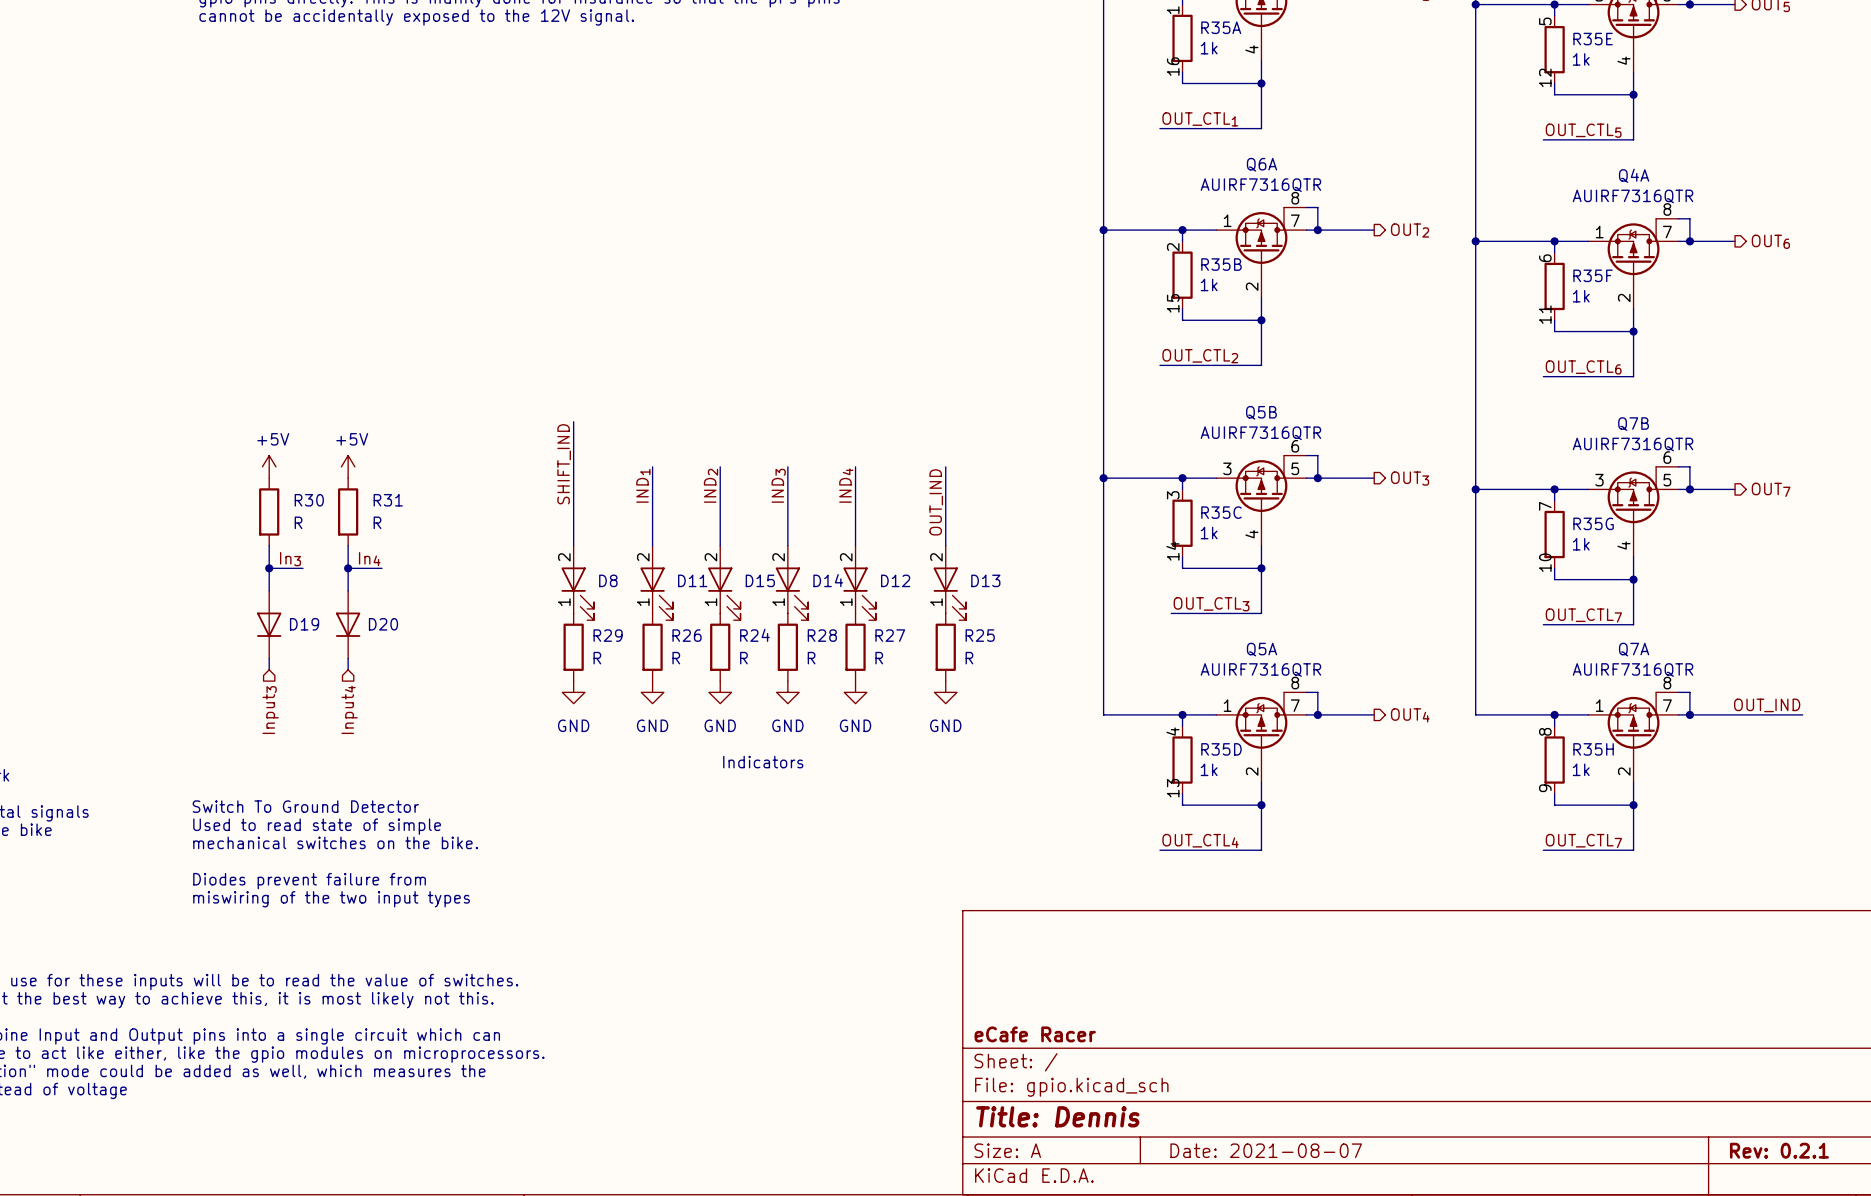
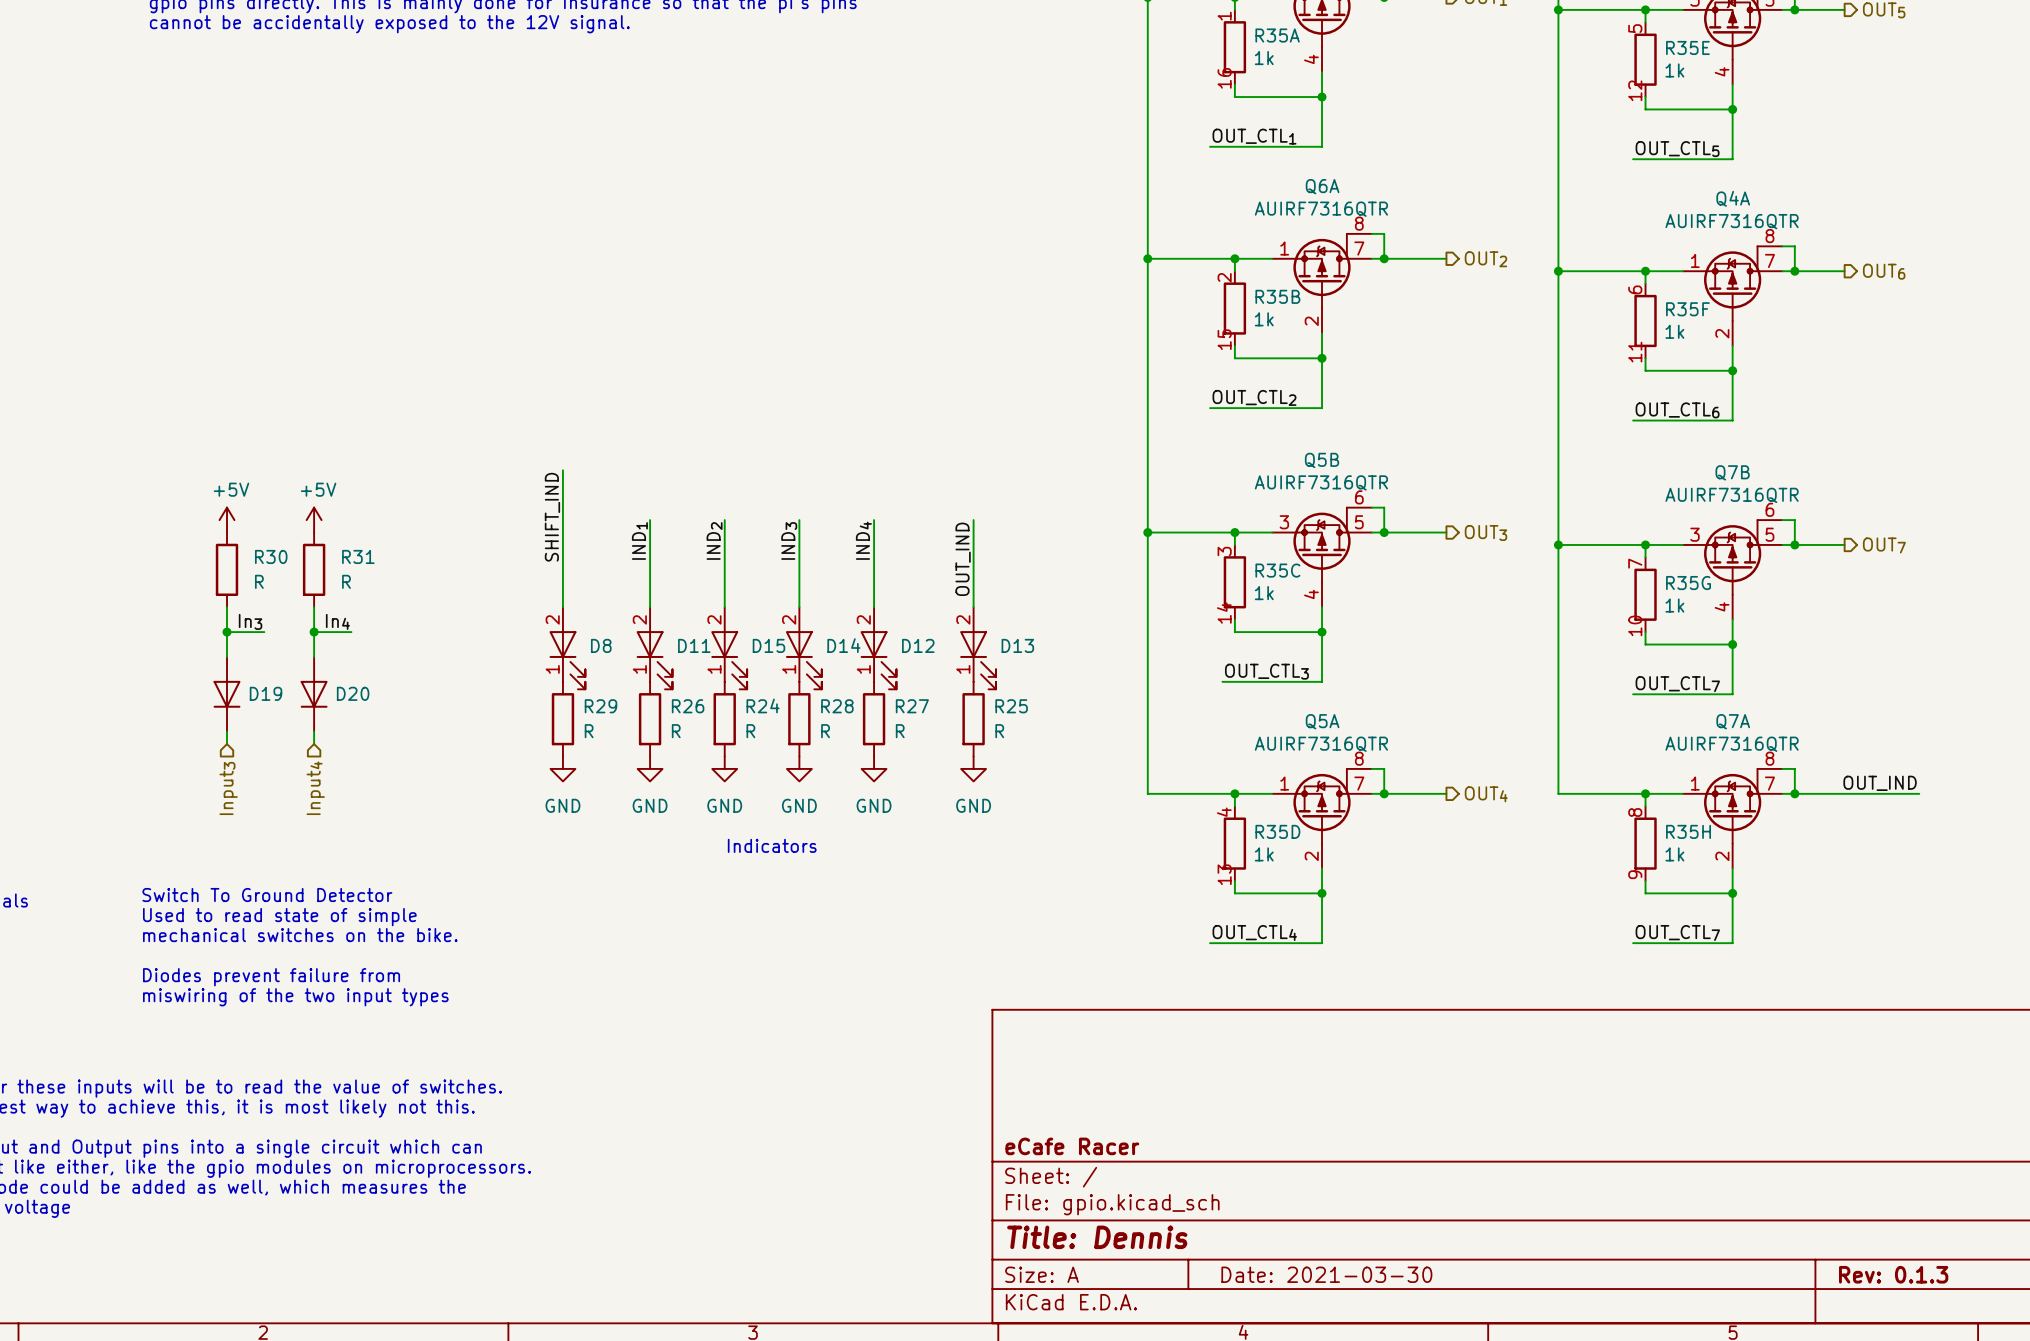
title block: Date: 2021-08-07 (1266, 1150) -> Date: 2021-03-30 (1326, 1274)
title block: Rev: 0.2.1 (1779, 1150) -> Rev: 0.1.3 (1893, 1274)

